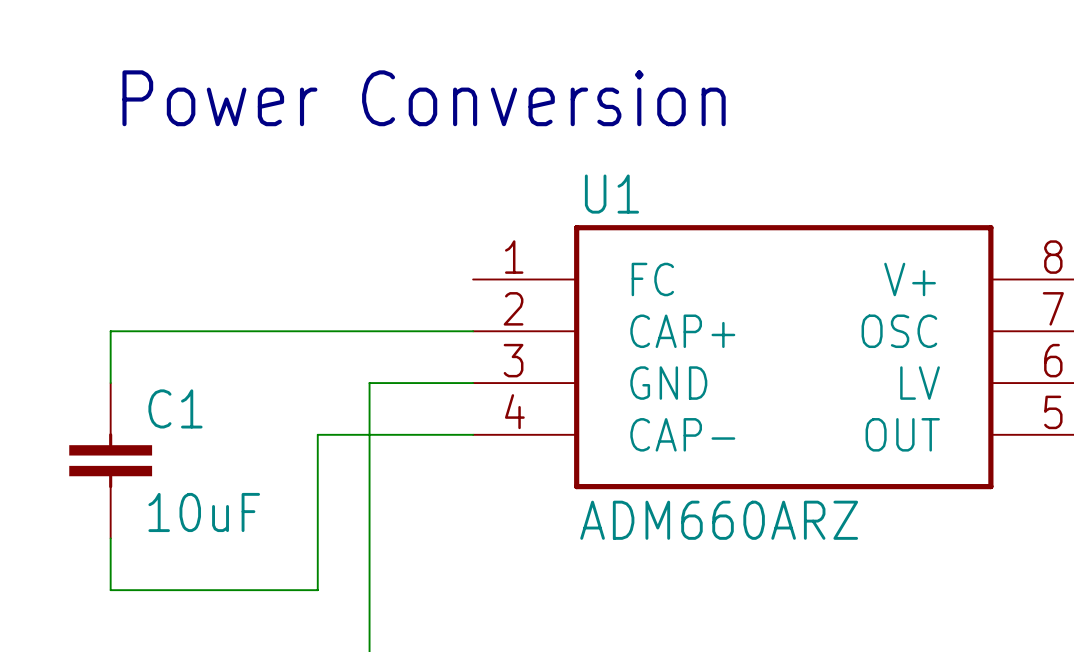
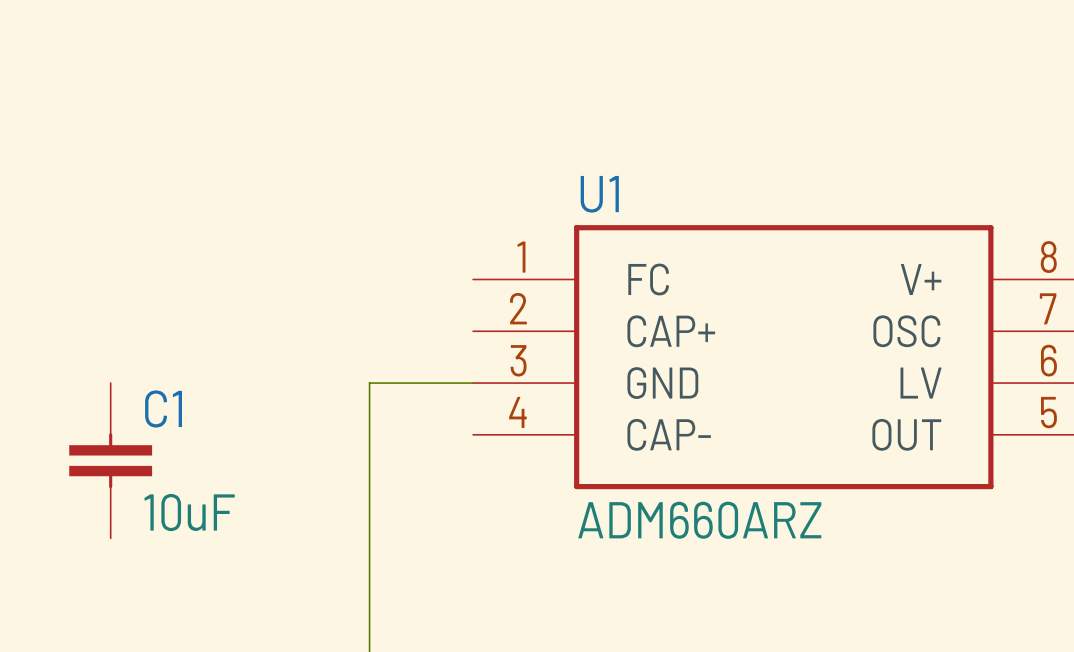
text: Power Conversion (424, 98) -> none
wire: (473, 331) (110, 331) (110, 383) -> none
wire: (473, 434) (317, 434) (317, 590) (110, 590) (110, 538) -> none

